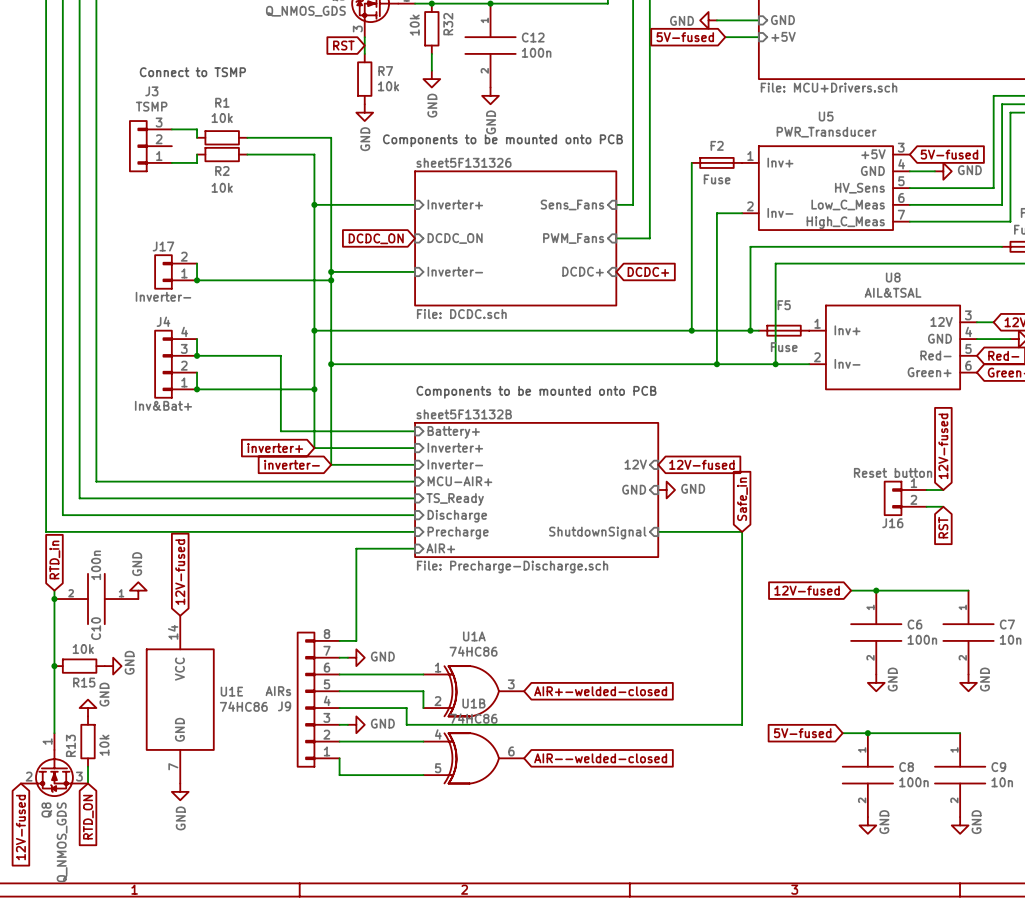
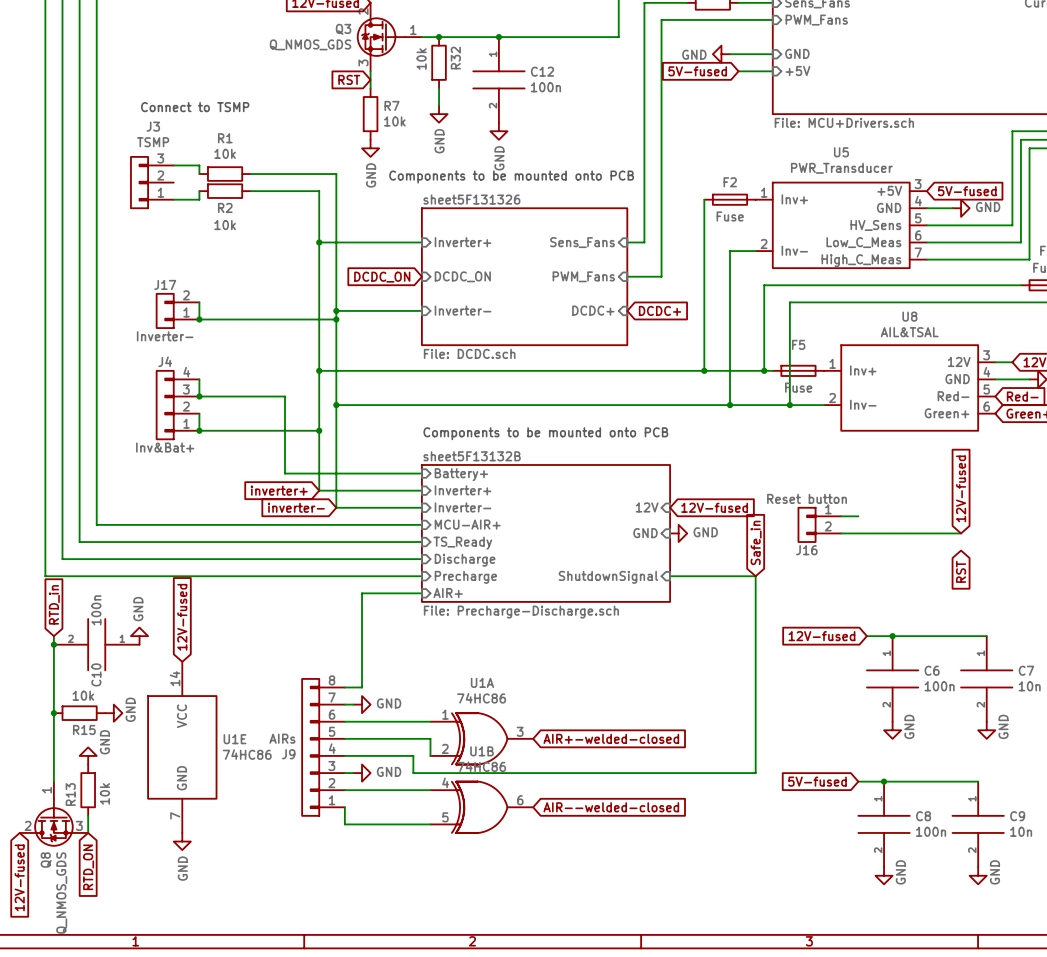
wire: none -> (841, 533) (943, 533)
J16 position: (905, 498) -> (819, 524)
wire: (926, 506) (943, 506) -> (841, 516) (858, 516)

